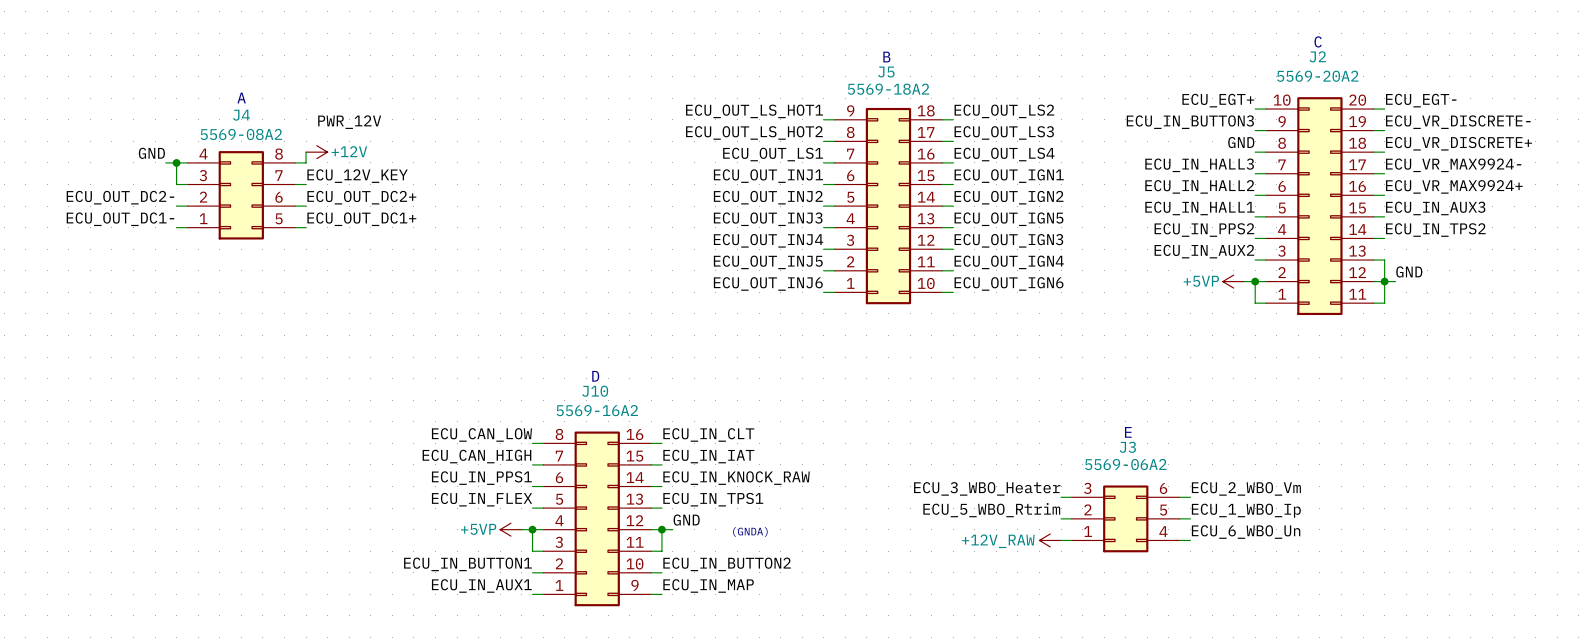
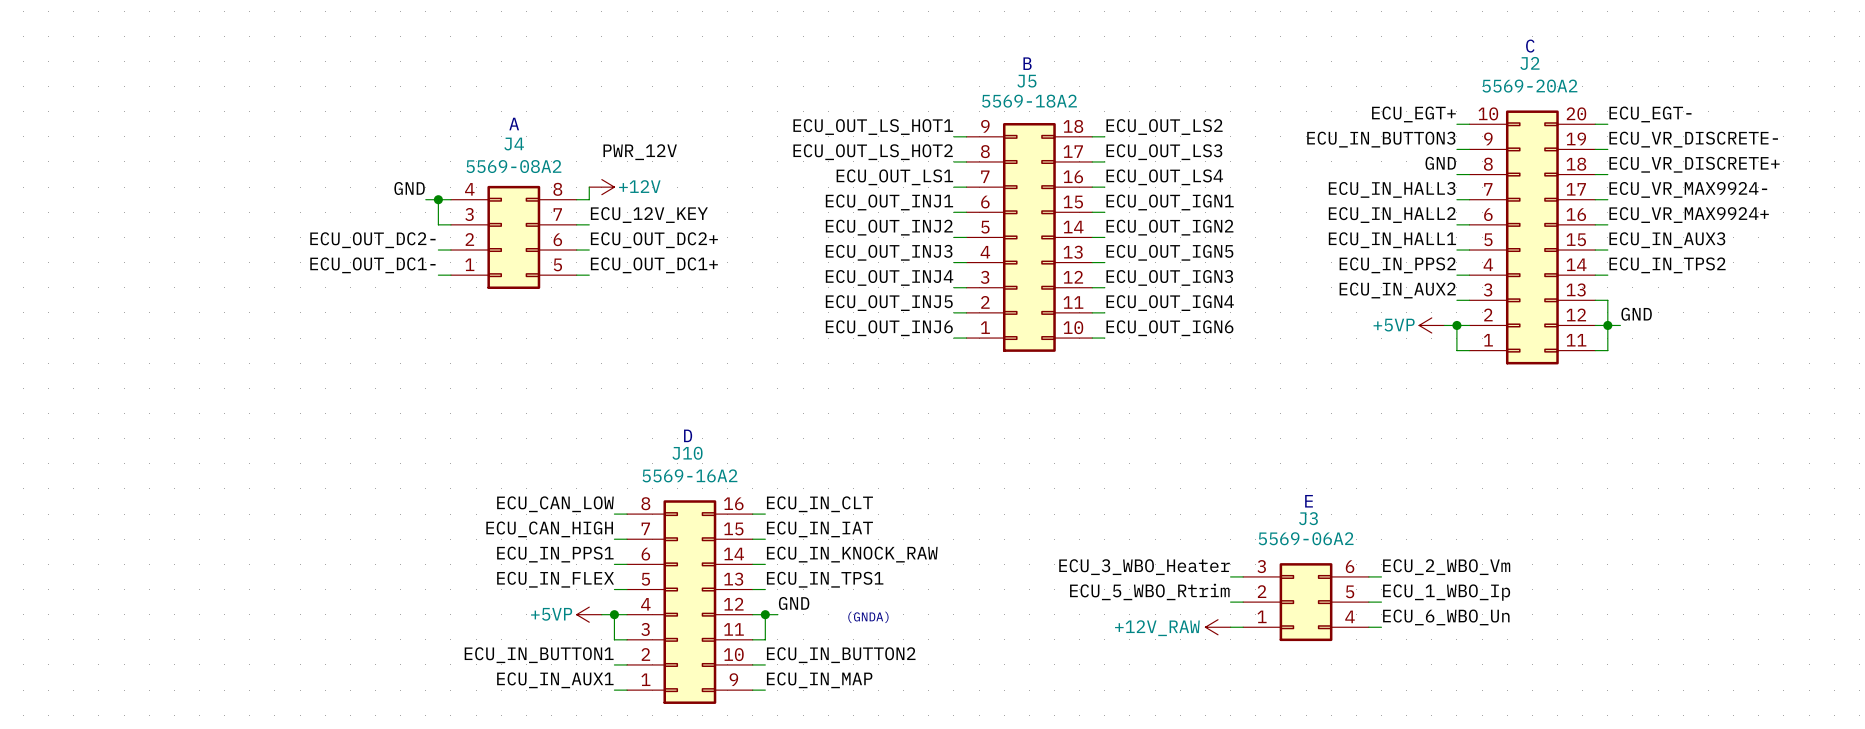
text position: A (241, 98) -> A (514, 124)
label position: PWR_12V (349, 122) -> PWR_12V (640, 152)
wire: (306, 152) (306, 162) (295, 162) -> (589, 187) (589, 199) (576, 199)
power symbol position: +12V (316, 152) -> +12V (601, 187)
label position: GND (151, 153) -> GND (409, 188)
wire: (165, 162) (187, 162) -> (425, 199) (450, 199)
wire: (176, 162) (176, 184) (187, 184) -> (438, 199) (438, 224) (450, 224)
junction: (176, 162) -> none
junction: none -> (438, 199)
label position: ECU_12V_KEY (357, 176) -> ECU_12V_KEY (649, 215)
wire: (295, 184) (306, 184) -> (576, 224) (589, 224)
J4 position: (241, 195) -> (513, 237)
label position: ECU_OUT_DC2- (120, 197) -> ECU_OUT_DC2- (372, 240)
label position: ECU_OUT_DC2+ (361, 197) -> ECU_OUT_DC2+ (654, 240)
wire: (176, 206) (187, 206) -> (438, 250) (450, 250)
wire: (295, 206) (306, 206) -> (576, 250) (589, 250)
label position: ECU_OUT_DC1- (120, 219) -> ECU_OUT_DC1- (372, 265)
label position: ECU_OUT_DC1+ (361, 219) -> ECU_OUT_DC1+ (654, 265)
wire: (176, 227) (187, 227) -> (438, 275) (450, 275)
wire: (295, 227) (306, 227) -> (576, 275) (589, 275)

